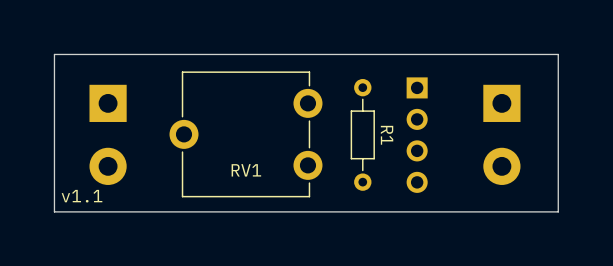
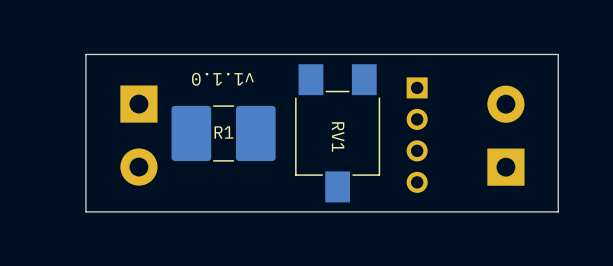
board edge: (85, 54) (54, 54) (54, 211) (85, 211) -> (85, 54) (85, 211)
RV1 footprint: [169, 71, 323, 198] -> [295, 64, 381, 203]
R1 footprint: [350, 78, 375, 191] -> [171, 105, 276, 162]
text: none -> v1.1.0 (222, 79)
part position: (108, 134) -> (138, 135)
part rotation: 0° (501, 134) -> 180° (505, 135)
RV1 name position: RV1 (246, 170) -> RV1 (338, 136)
text: v1.1 (82, 196) -> none

